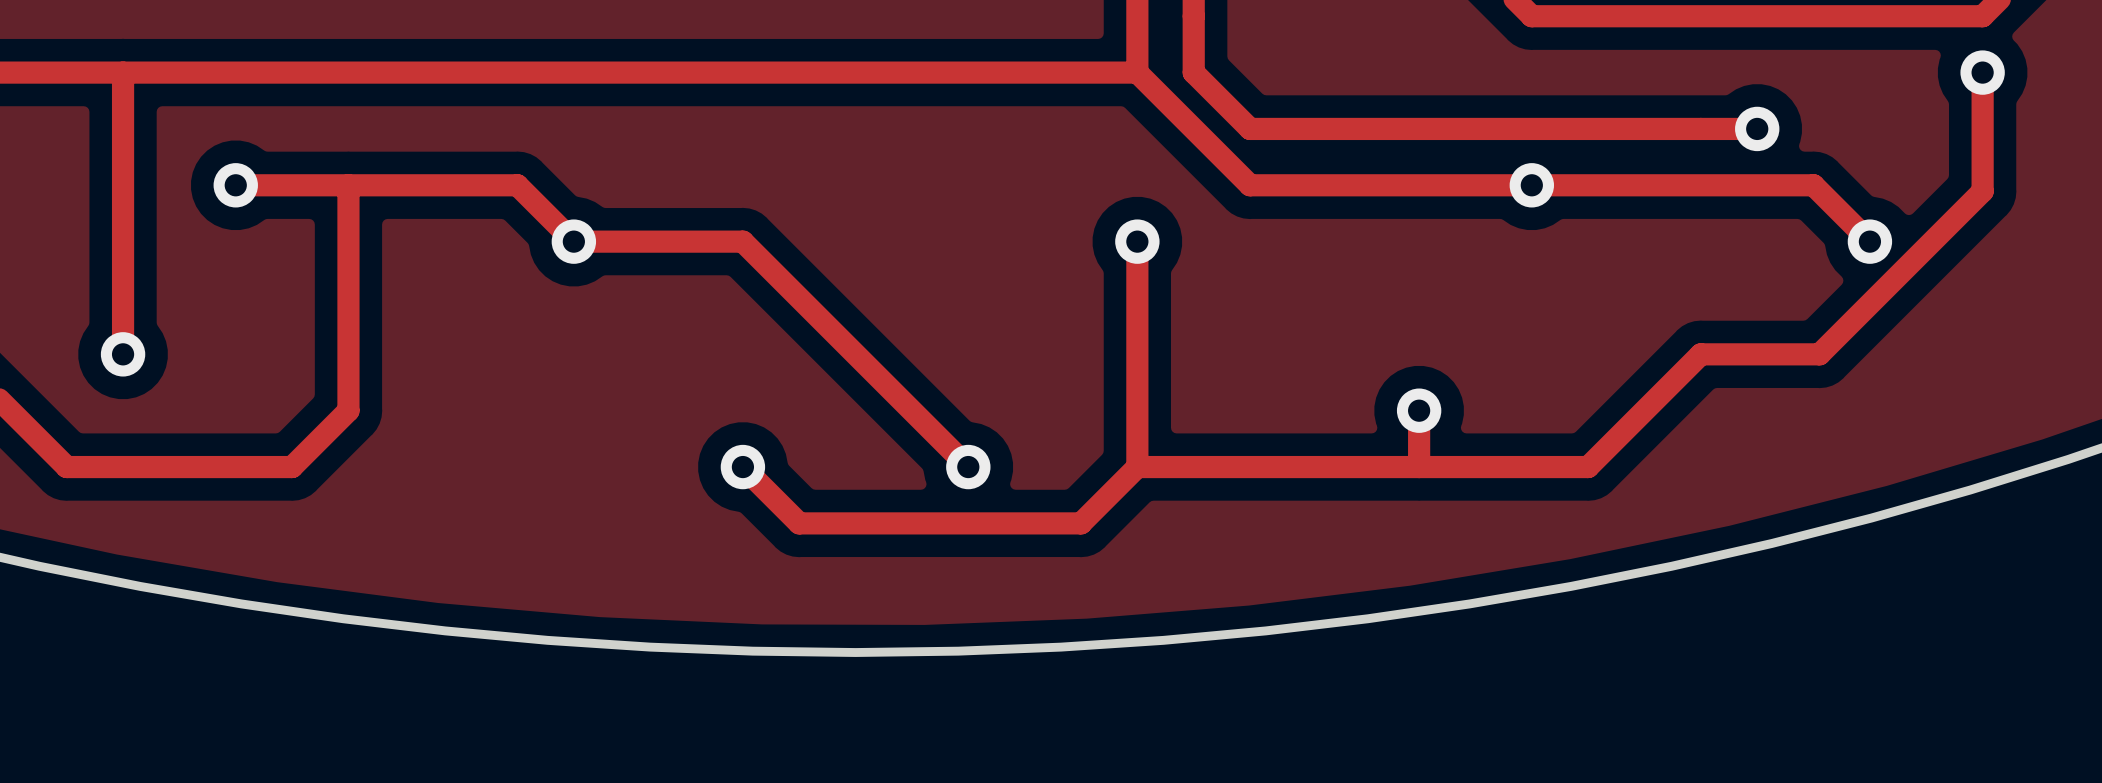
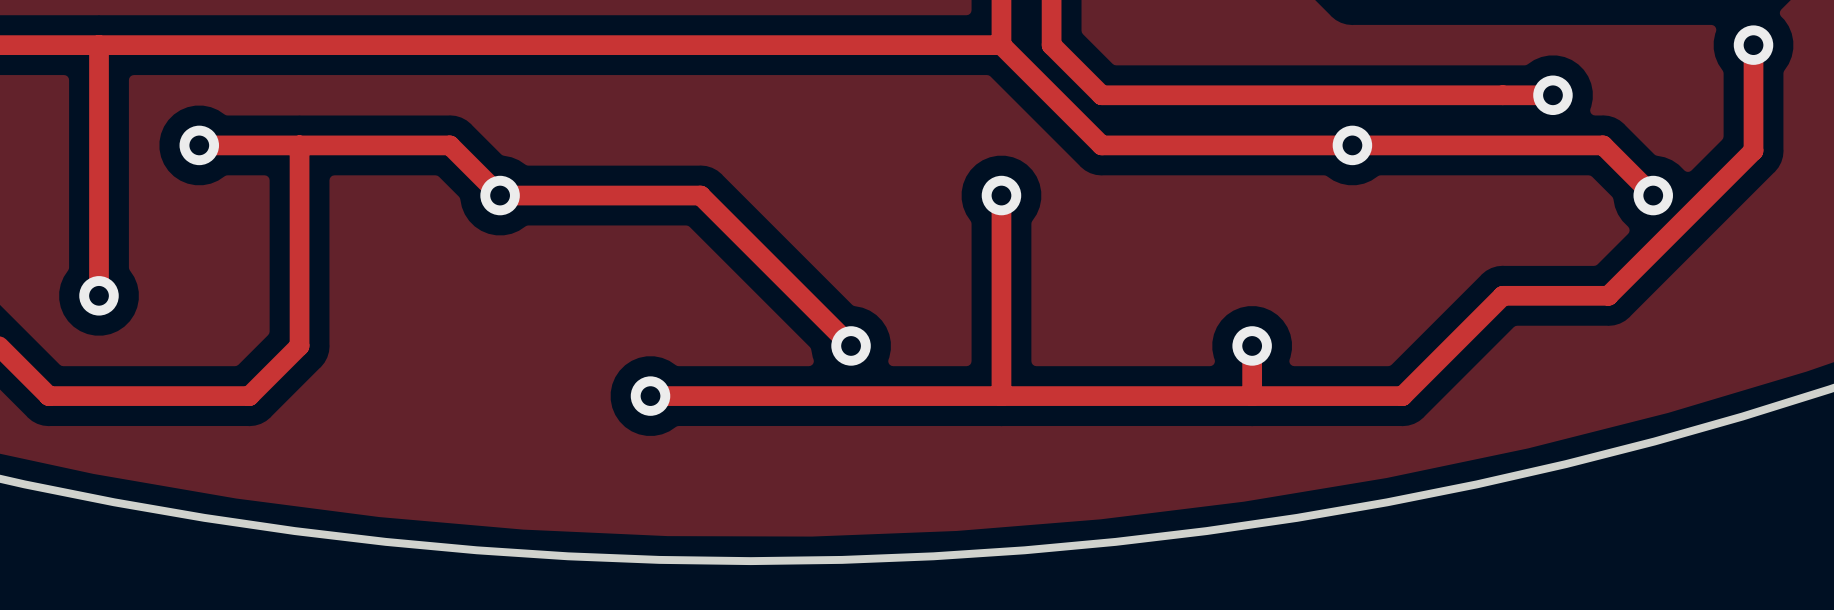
track: (742, 241) (968, 467) -> (650, 195) (700, 195) (851, 345)
track: (742, 467) (799, 523) (1081, 523) (1137, 467) -> (650, 396) (1001, 396)
via position: (968, 467) -> (851, 345)

